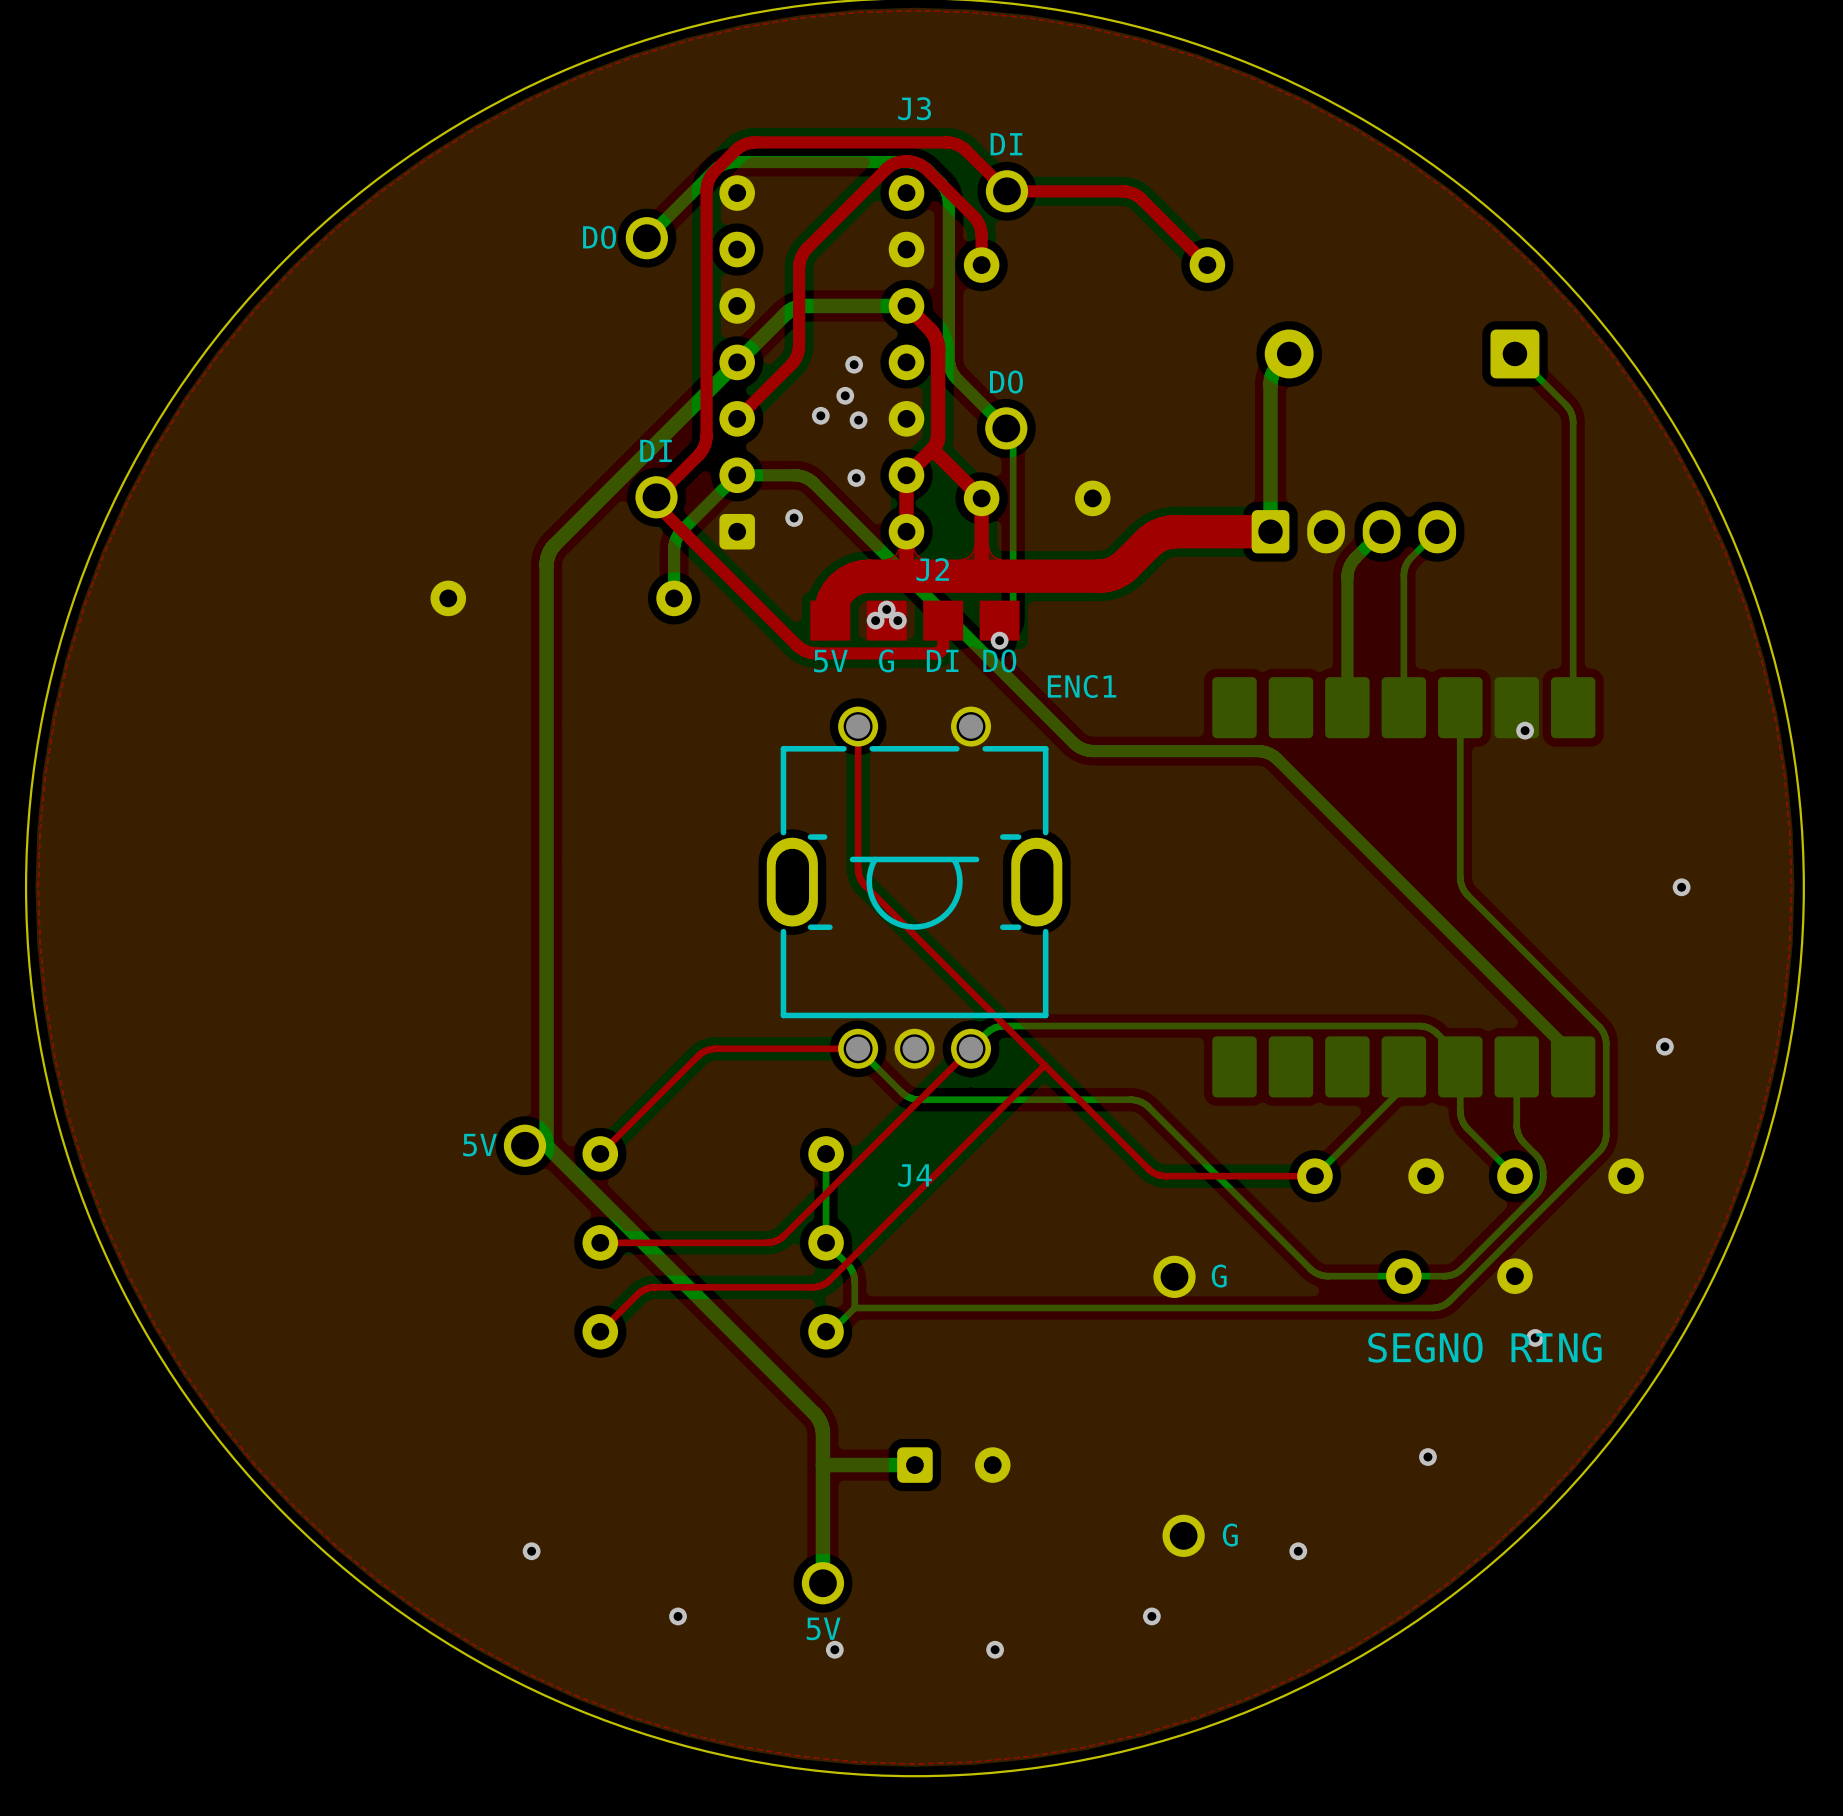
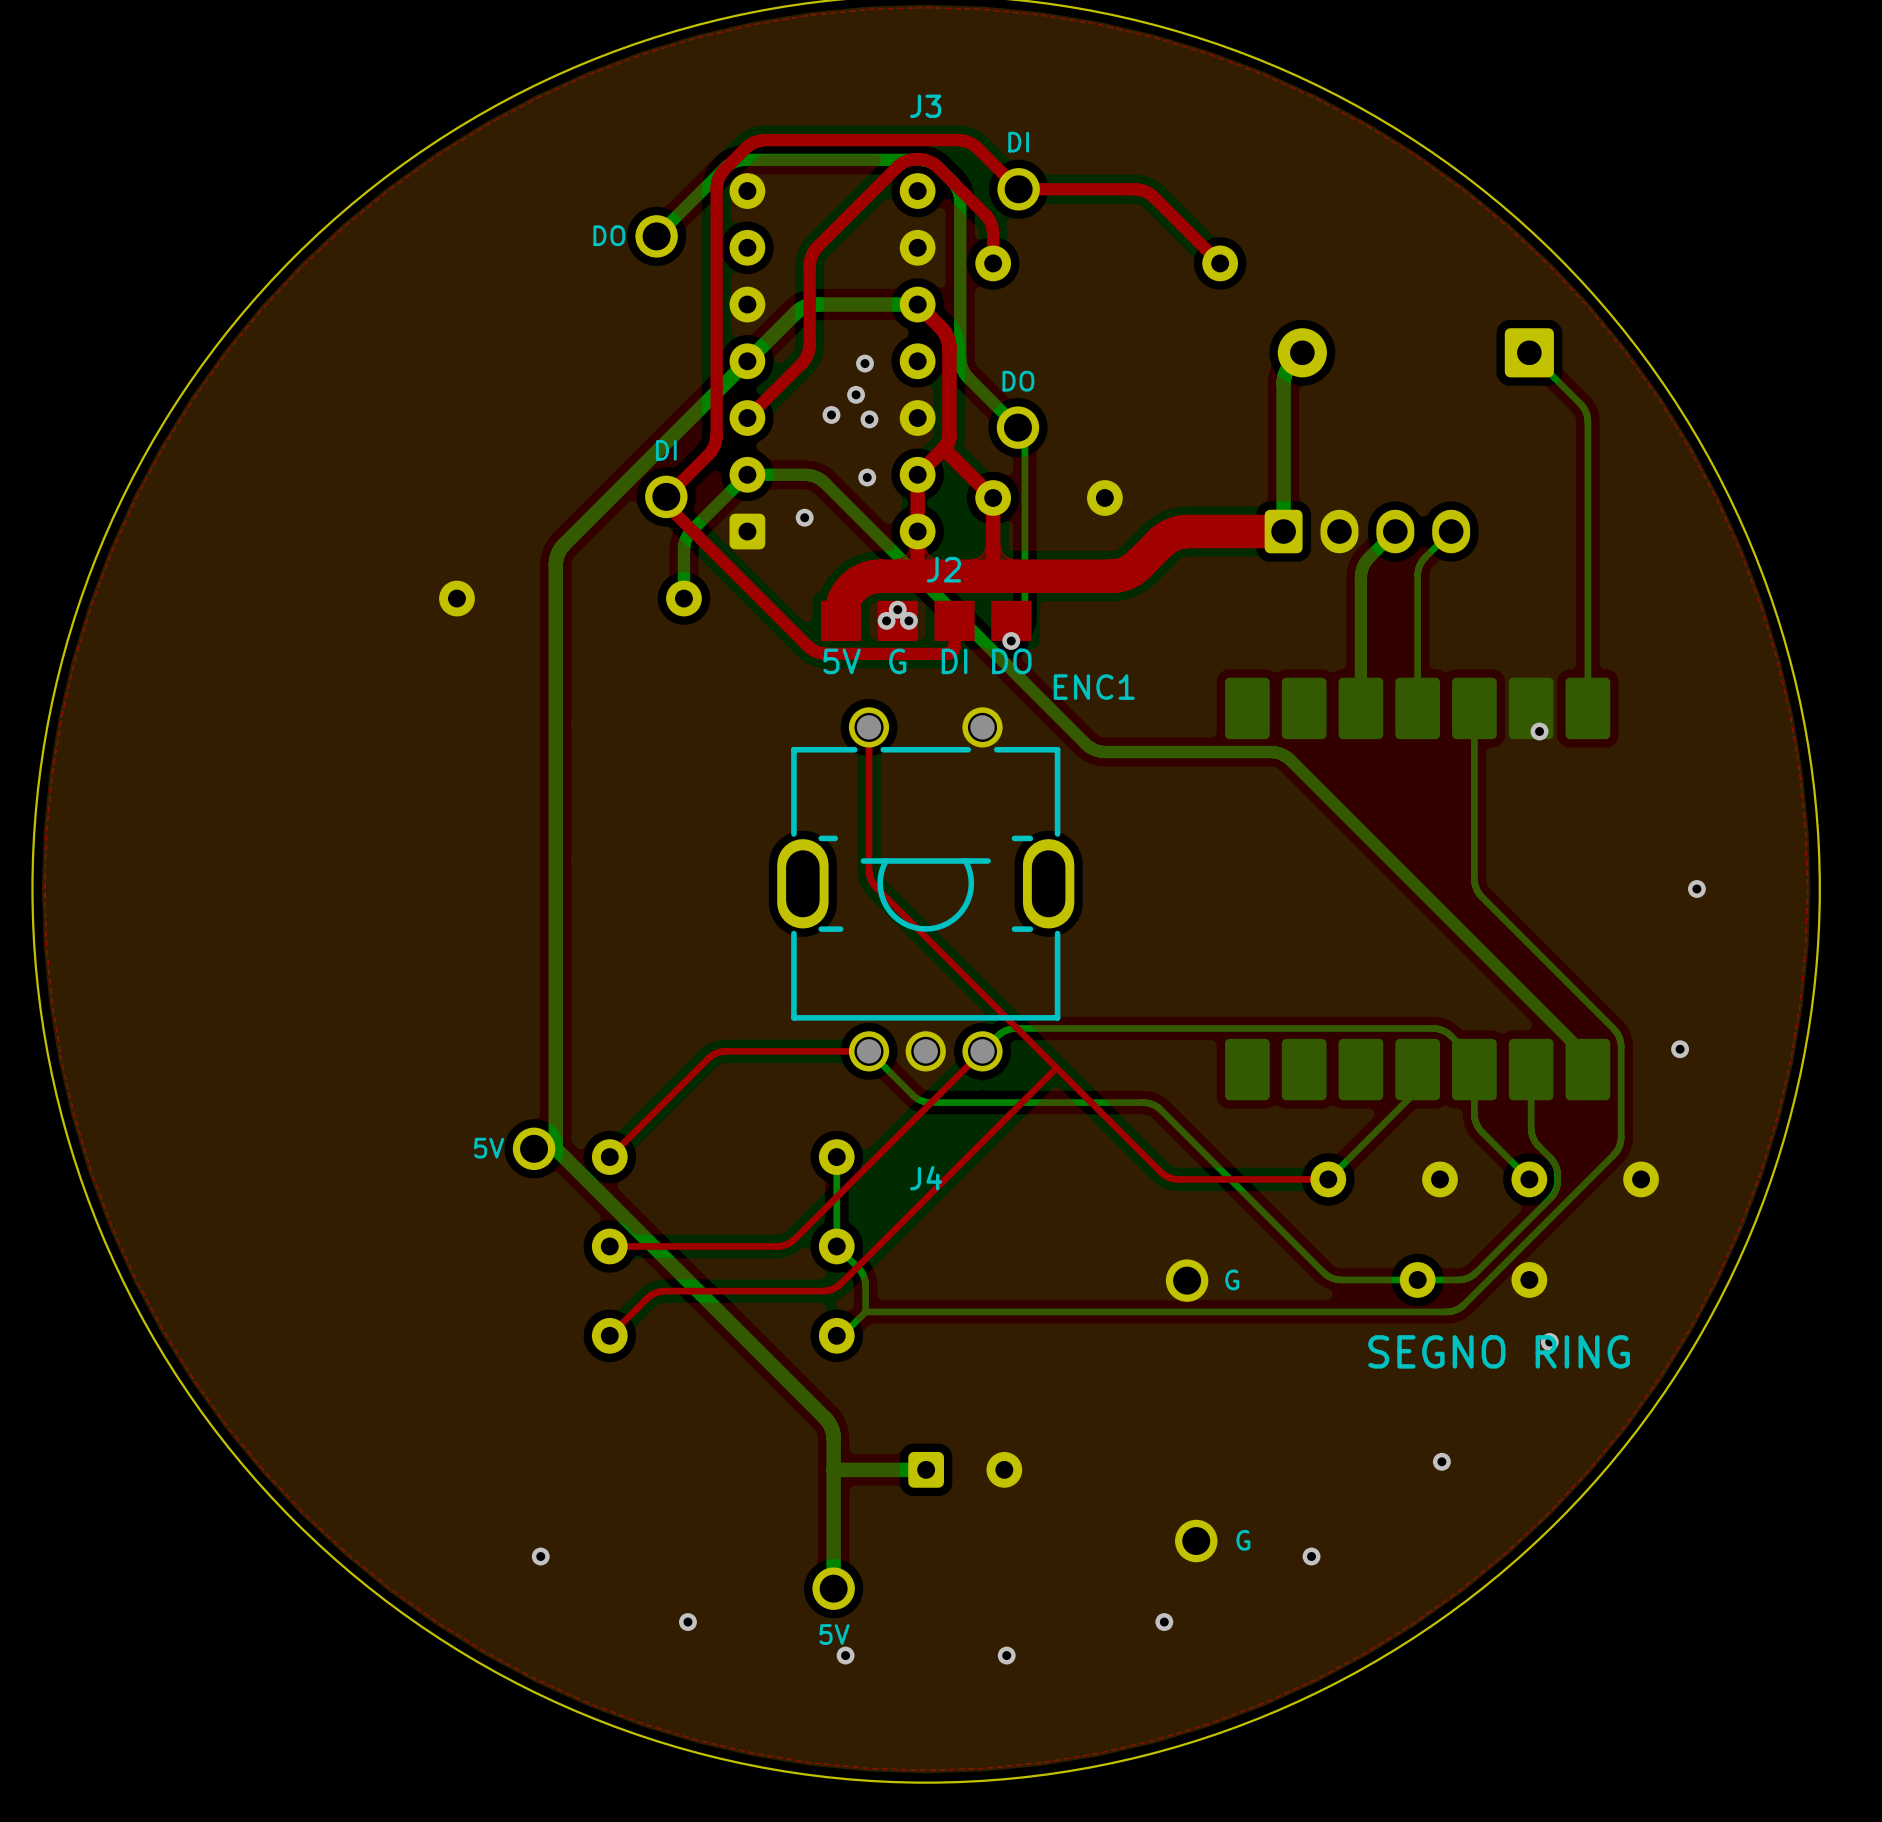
J3 footprint: [625, 170, 1205, 1605] -> [635, 168, 1218, 1610]
J4 footprint: [503, 407, 1196, 1298] -> [512, 406, 1209, 1302]

